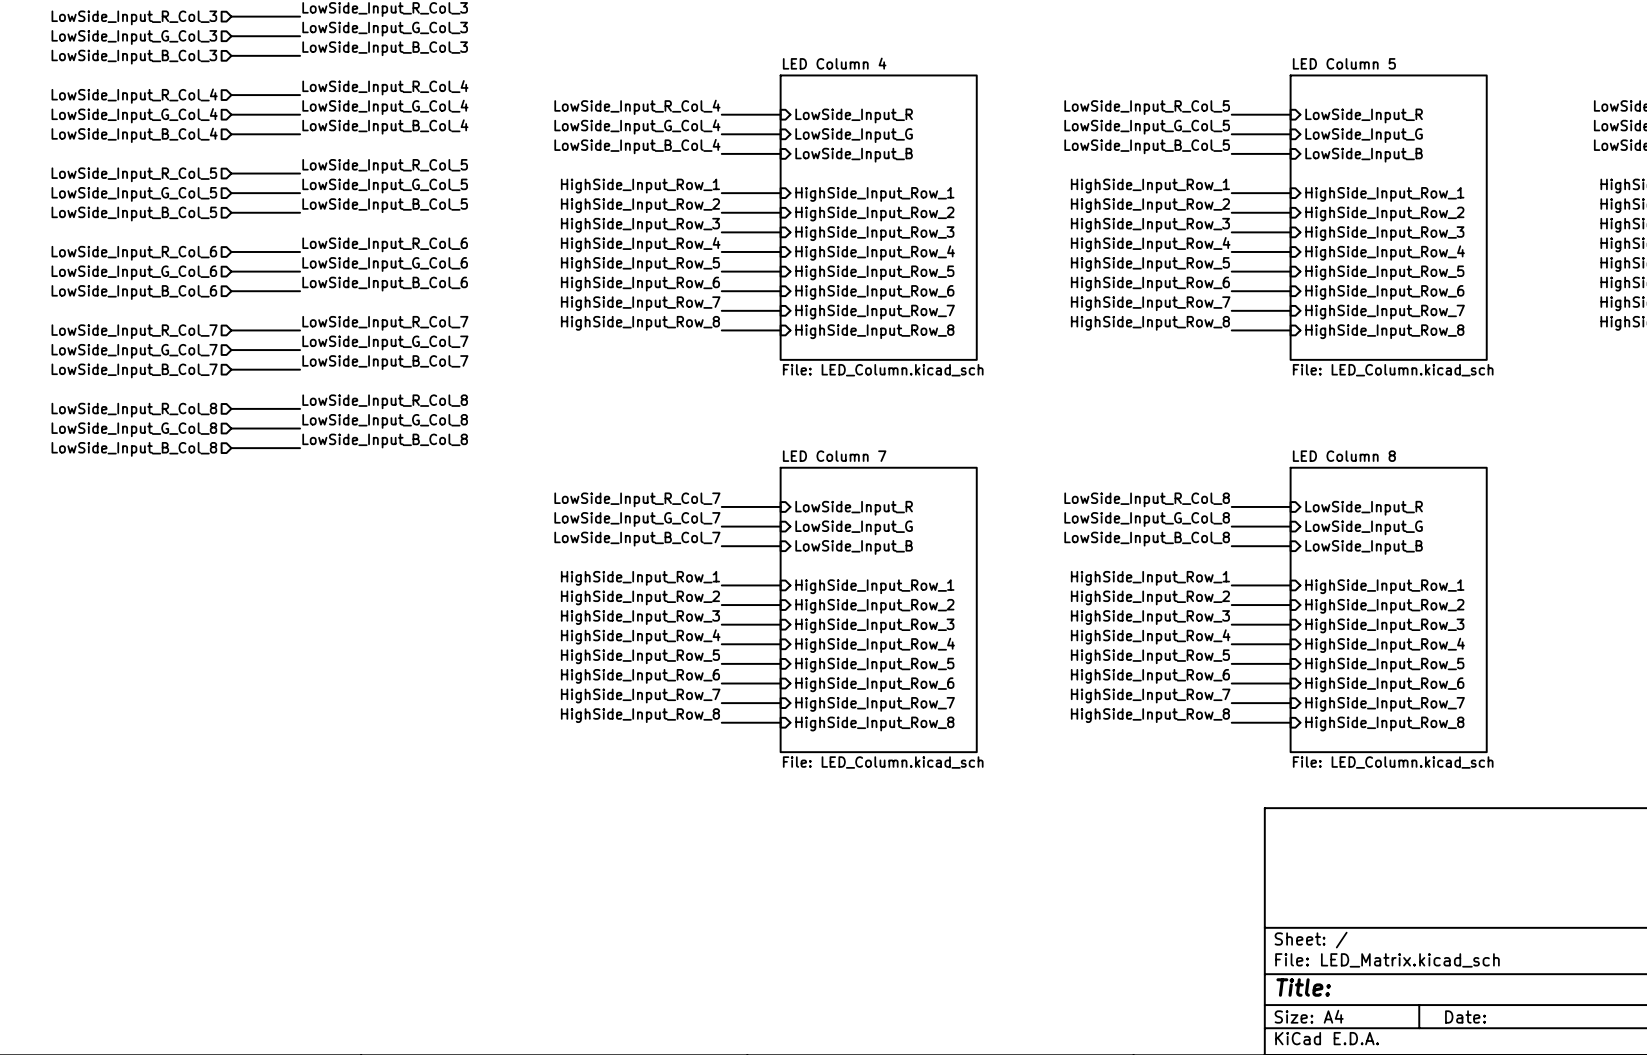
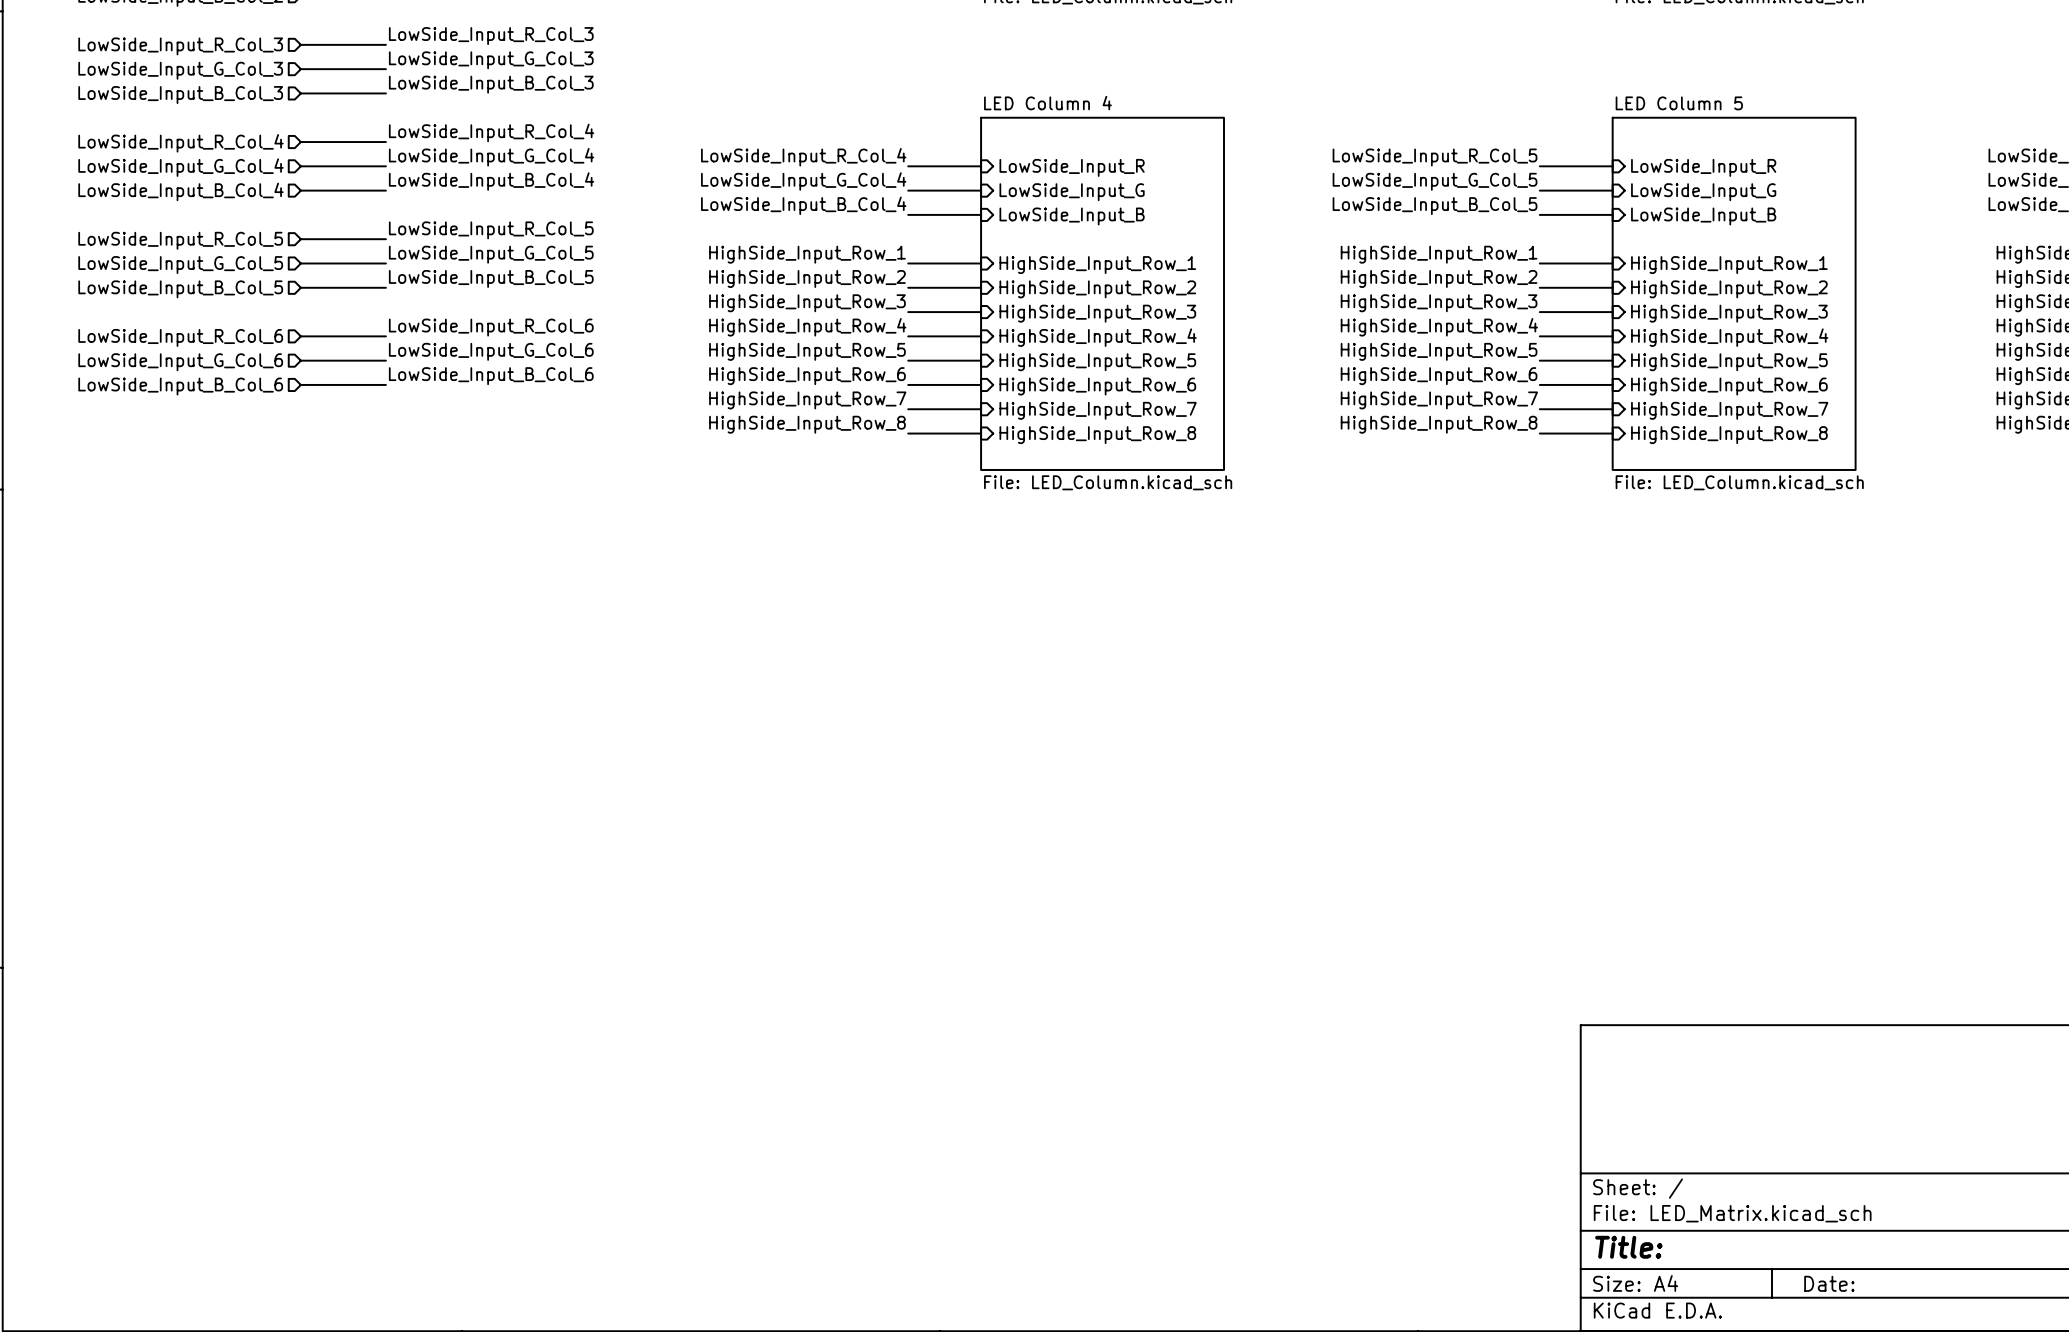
label: LowSide_Input_R_Col_7 (385, 323) -> none
wire: (231, 330) (300, 330) -> none
hierarchical label: LowSide_Input_R_Col_7 (134, 331) -> none
label: LowSide_Input_G_Col_7 (385, 342) -> none
wire: (231, 350) (300, 350) -> none
hierarchical label: LowSide_Input_G_Col_7 (134, 351) -> none
label: LowSide_Input_B_Col_7 (385, 362) -> none
wire: (231, 369) (300, 369) -> none
hierarchical label: LowSide_Input_B_Col_7 (134, 370) -> none
label: LowSide_Input_R_Col_8 (385, 401) -> none
wire: (231, 408) (300, 408) -> none
hierarchical label: LowSide_Input_R_Col_8 (134, 410) -> none
label: LowSide_Input_G_Col_8 (385, 421) -> none
wire: (231, 428) (300, 428) -> none
hierarchical label: LowSide_Input_G_Col_8 (134, 429) -> none
label: LowSide_Input_B_Col_8 (385, 441) -> none
wire: (231, 448) (300, 448) -> none
hierarchical label: LowSide_Input_B_Col_8 (134, 449) -> none
label: LowSide_Input_R_Col_7 (637, 499) -> none
label: LowSide_Input_R_Col_8 (1147, 499) -> none
wire: (721, 506) (780, 506) -> none
wire: (1231, 506) (1290, 506) -> none
sheet pin: LowSide_Input_R (854, 508) -> none
sheet pin: LowSide_Input_R (1364, 508) -> none
label: LowSide_Input_G_Col_7 (637, 519) -> none
label: LowSide_Input_G_Col_8 (1147, 519) -> none
wire: (721, 526) (780, 526) -> none
wire: (1231, 526) (1290, 526) -> none
sheet pin: LowSide_Input_G (854, 527) -> none
sheet pin: LowSide_Input_G (1364, 527) -> none
label: LowSide_Input_B_Col_7 (637, 539) -> none
label: LowSide_Input_B_Col_8 (1147, 539) -> none
wire: (721, 546) (780, 546) -> none
wire: (1231, 546) (1290, 546) -> none
sheet pin: LowSide_Input_B (854, 547) -> none
sheet pin: LowSide_Input_B (1364, 547) -> none
label: HighSide_Input_Row_1 (640, 578) -> none
label: HighSide_Input_Row_1 (1150, 578) -> none
wire: (721, 585) (780, 585) -> none
wire: (1231, 585) (1290, 585) -> none
sheet pin: HighSide_Input_Row_1 (874, 586) -> none
sheet pin: HighSide_Input_Row_1 (1384, 586) -> none
label: HighSide_Input_Row_2 (640, 597) -> none
label: HighSide_Input_Row_2 (1150, 597) -> none
wire: (721, 605) (780, 605) -> none
wire: (1231, 605) (1290, 605) -> none
sheet pin: HighSide_Input_Row_2 (874, 606) -> none
sheet pin: HighSide_Input_Row_2 (1384, 606) -> none
sheet LED Column 7: File: LED_Column.kicad_sch (878, 609) -> none
sheet LED Column 8: File: LED_Column.kicad_sch (1388, 609) -> none
label: HighSide_Input_Row_3 (640, 617) -> none
label: HighSide_Input_Row_3 (1150, 617) -> none
wire: (721, 624) (780, 624) -> none
wire: (1231, 624) (1290, 624) -> none
sheet pin: HighSide_Input_Row_3 (874, 625) -> none
sheet pin: HighSide_Input_Row_3 (1384, 625) -> none
label: HighSide_Input_Row_4 (640, 636) -> none
label: HighSide_Input_Row_4 (1150, 636) -> none
wire: (721, 644) (780, 644) -> none
wire: (1231, 644) (1290, 644) -> none
sheet pin: HighSide_Input_Row_4 (875, 645) -> none
sheet pin: HighSide_Input_Row_4 (1385, 645) -> none
label: HighSide_Input_Row_5 (640, 656) -> none
label: HighSide_Input_Row_5 (1150, 656) -> none
wire: (721, 663) (780, 663) -> none
wire: (1231, 663) (1290, 663) -> none
sheet pin: HighSide_Input_Row_5 (874, 665) -> none
sheet pin: HighSide_Input_Row_5 (1384, 665) -> none
label: HighSide_Input_Row_6 (640, 676) -> none
label: HighSide_Input_Row_6 (1150, 676) -> none
wire: (721, 683) (780, 683) -> none
wire: (1231, 683) (1290, 683) -> none
sheet pin: HighSide_Input_Row_6 (874, 684) -> none
sheet pin: HighSide_Input_Row_6 (1384, 684) -> none
label: HighSide_Input_Row_7 (640, 696) -> none
label: HighSide_Input_Row_7 (1150, 696) -> none
wire: (721, 703) (780, 703) -> none
wire: (1231, 703) (1290, 703) -> none
sheet pin: HighSide_Input_Row_7 (875, 704) -> none
sheet pin: HighSide_Input_Row_7 (1385, 704) -> none
label: HighSide_Input_Row_8 (640, 715) -> none
label: HighSide_Input_Row_8 (1150, 715) -> none
wire: (721, 722) (780, 722) -> none
wire: (1231, 722) (1290, 722) -> none
sheet pin: HighSide_Input_Row_8 (874, 724) -> none
sheet pin: HighSide_Input_Row_8 (1384, 724) -> none

